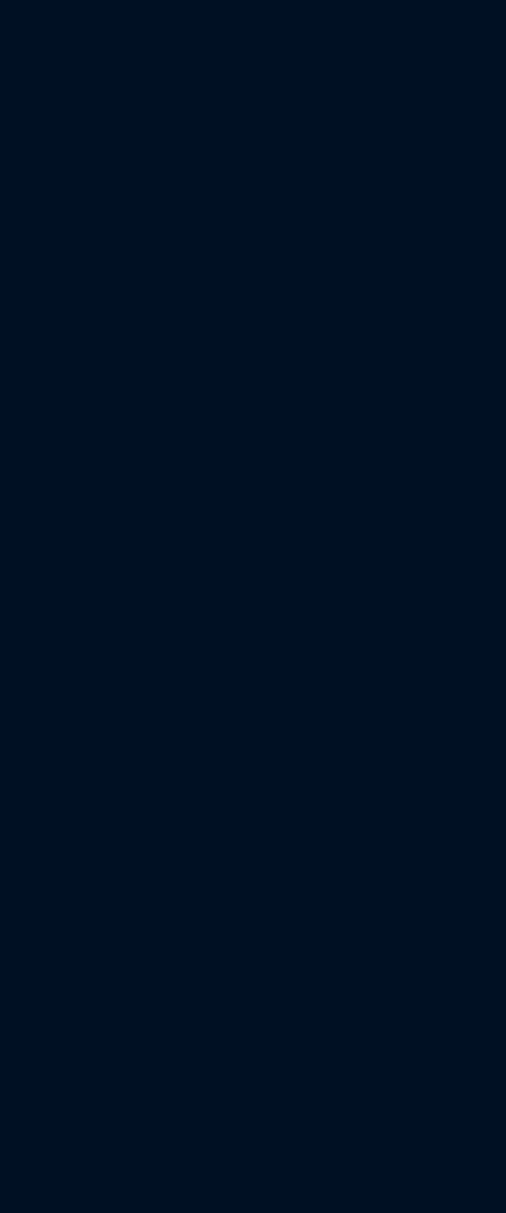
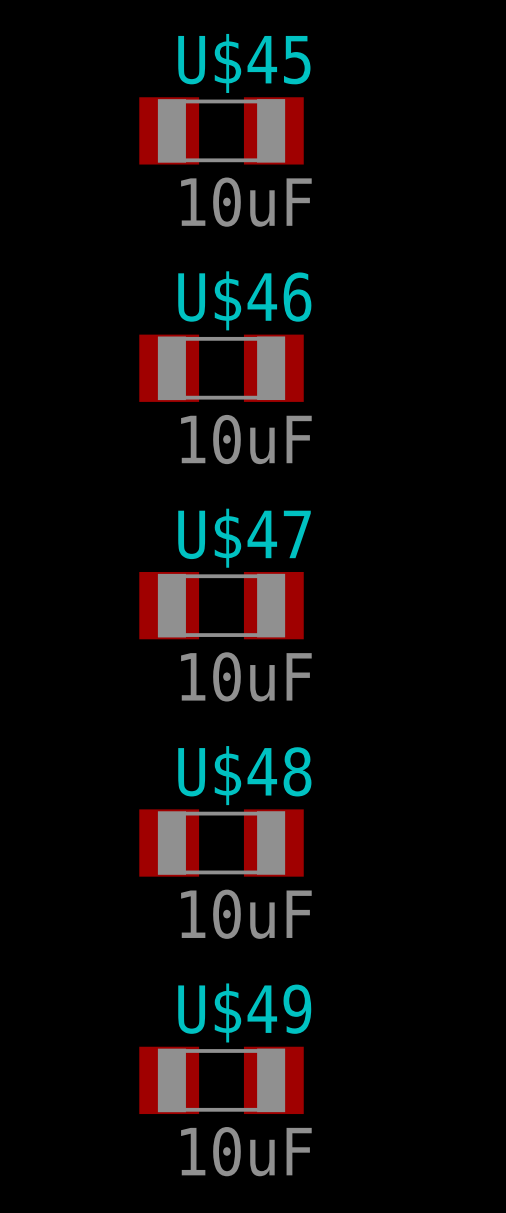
U$45: none -> 10uF (221, 130)
U$46: none -> 10uF (221, 368)
U$47: none -> 10uF (221, 605)
U$48: none -> 10uF (221, 843)
U$49: none -> 10uF (221, 1080)

